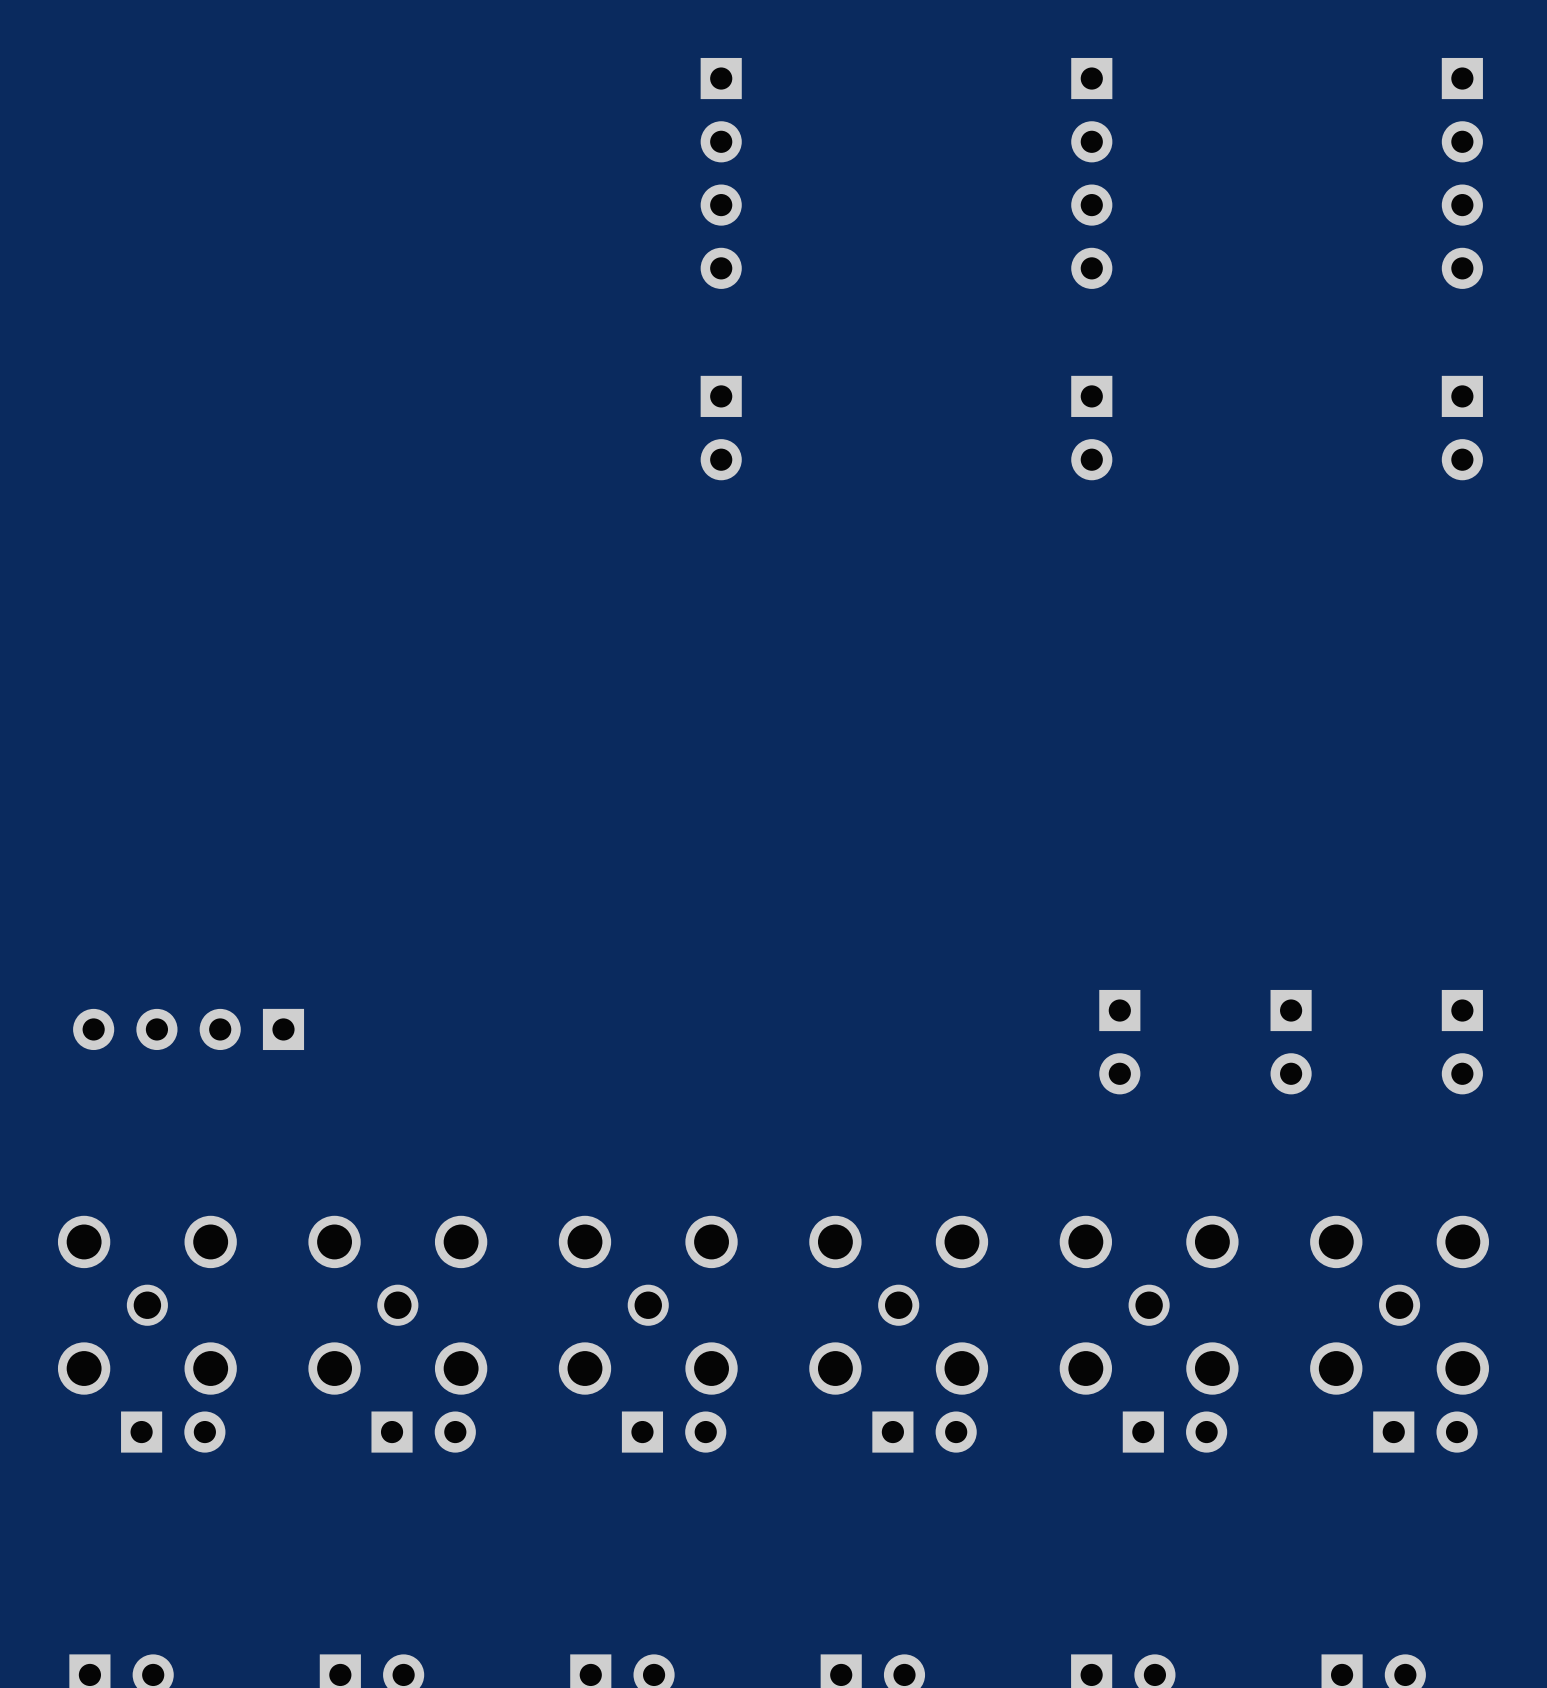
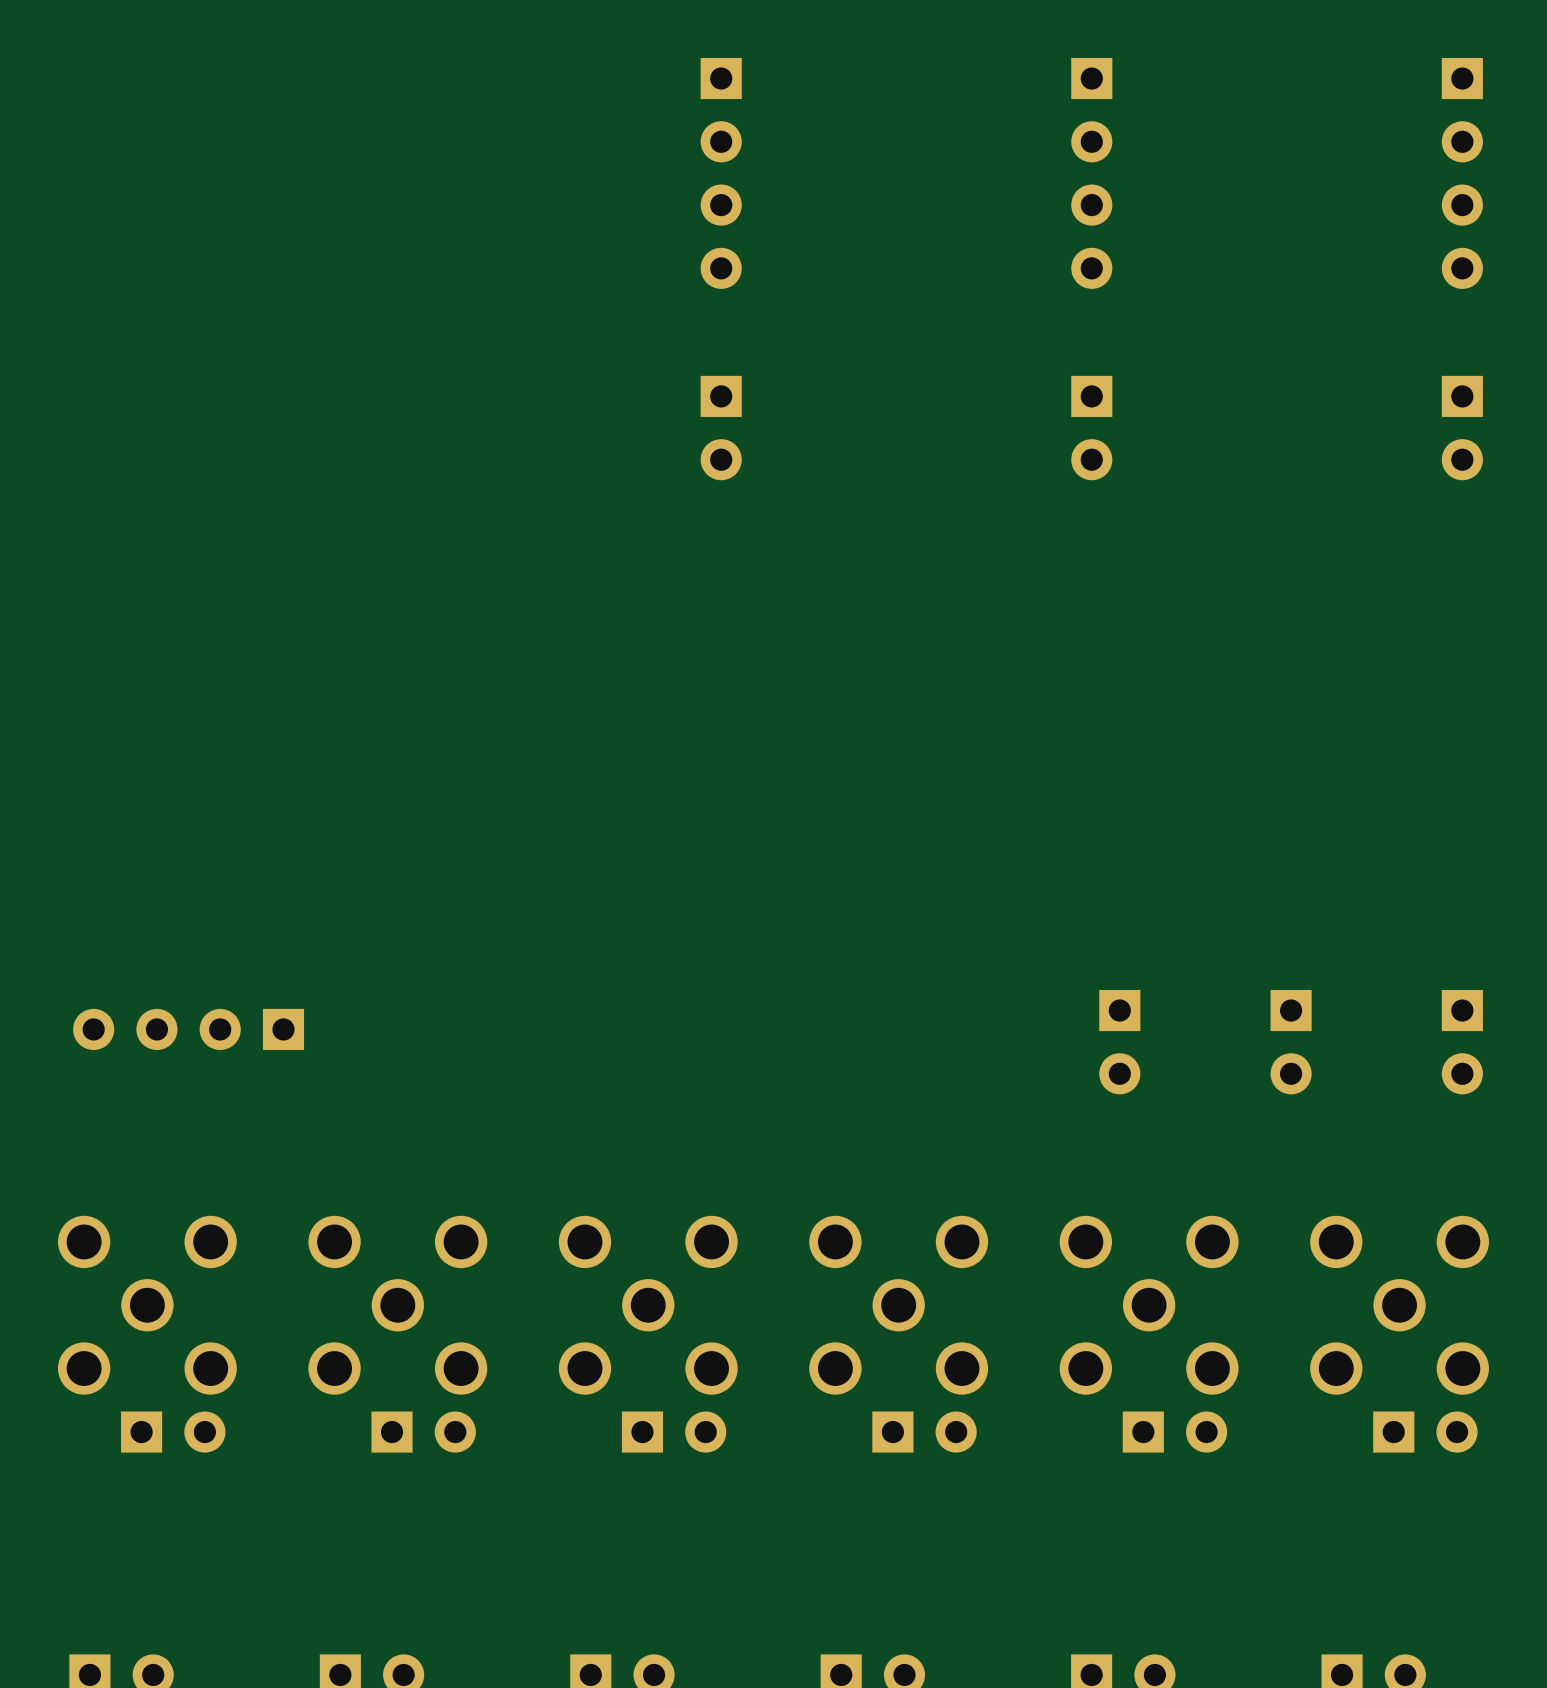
part footprint: [57, 1215, 237, 1395] -> [57, 1215, 237, 1395]
part footprint: [308, 1215, 488, 1395] -> [308, 1215, 488, 1395]
part footprint: [558, 1215, 738, 1395] -> [558, 1215, 738, 1395]
part footprint: [809, 1215, 989, 1395] -> [809, 1215, 989, 1395]
part footprint: [1059, 1215, 1239, 1395] -> [1059, 1215, 1239, 1395]
part footprint: [1310, 1215, 1489, 1395] -> [1310, 1215, 1489, 1395]

